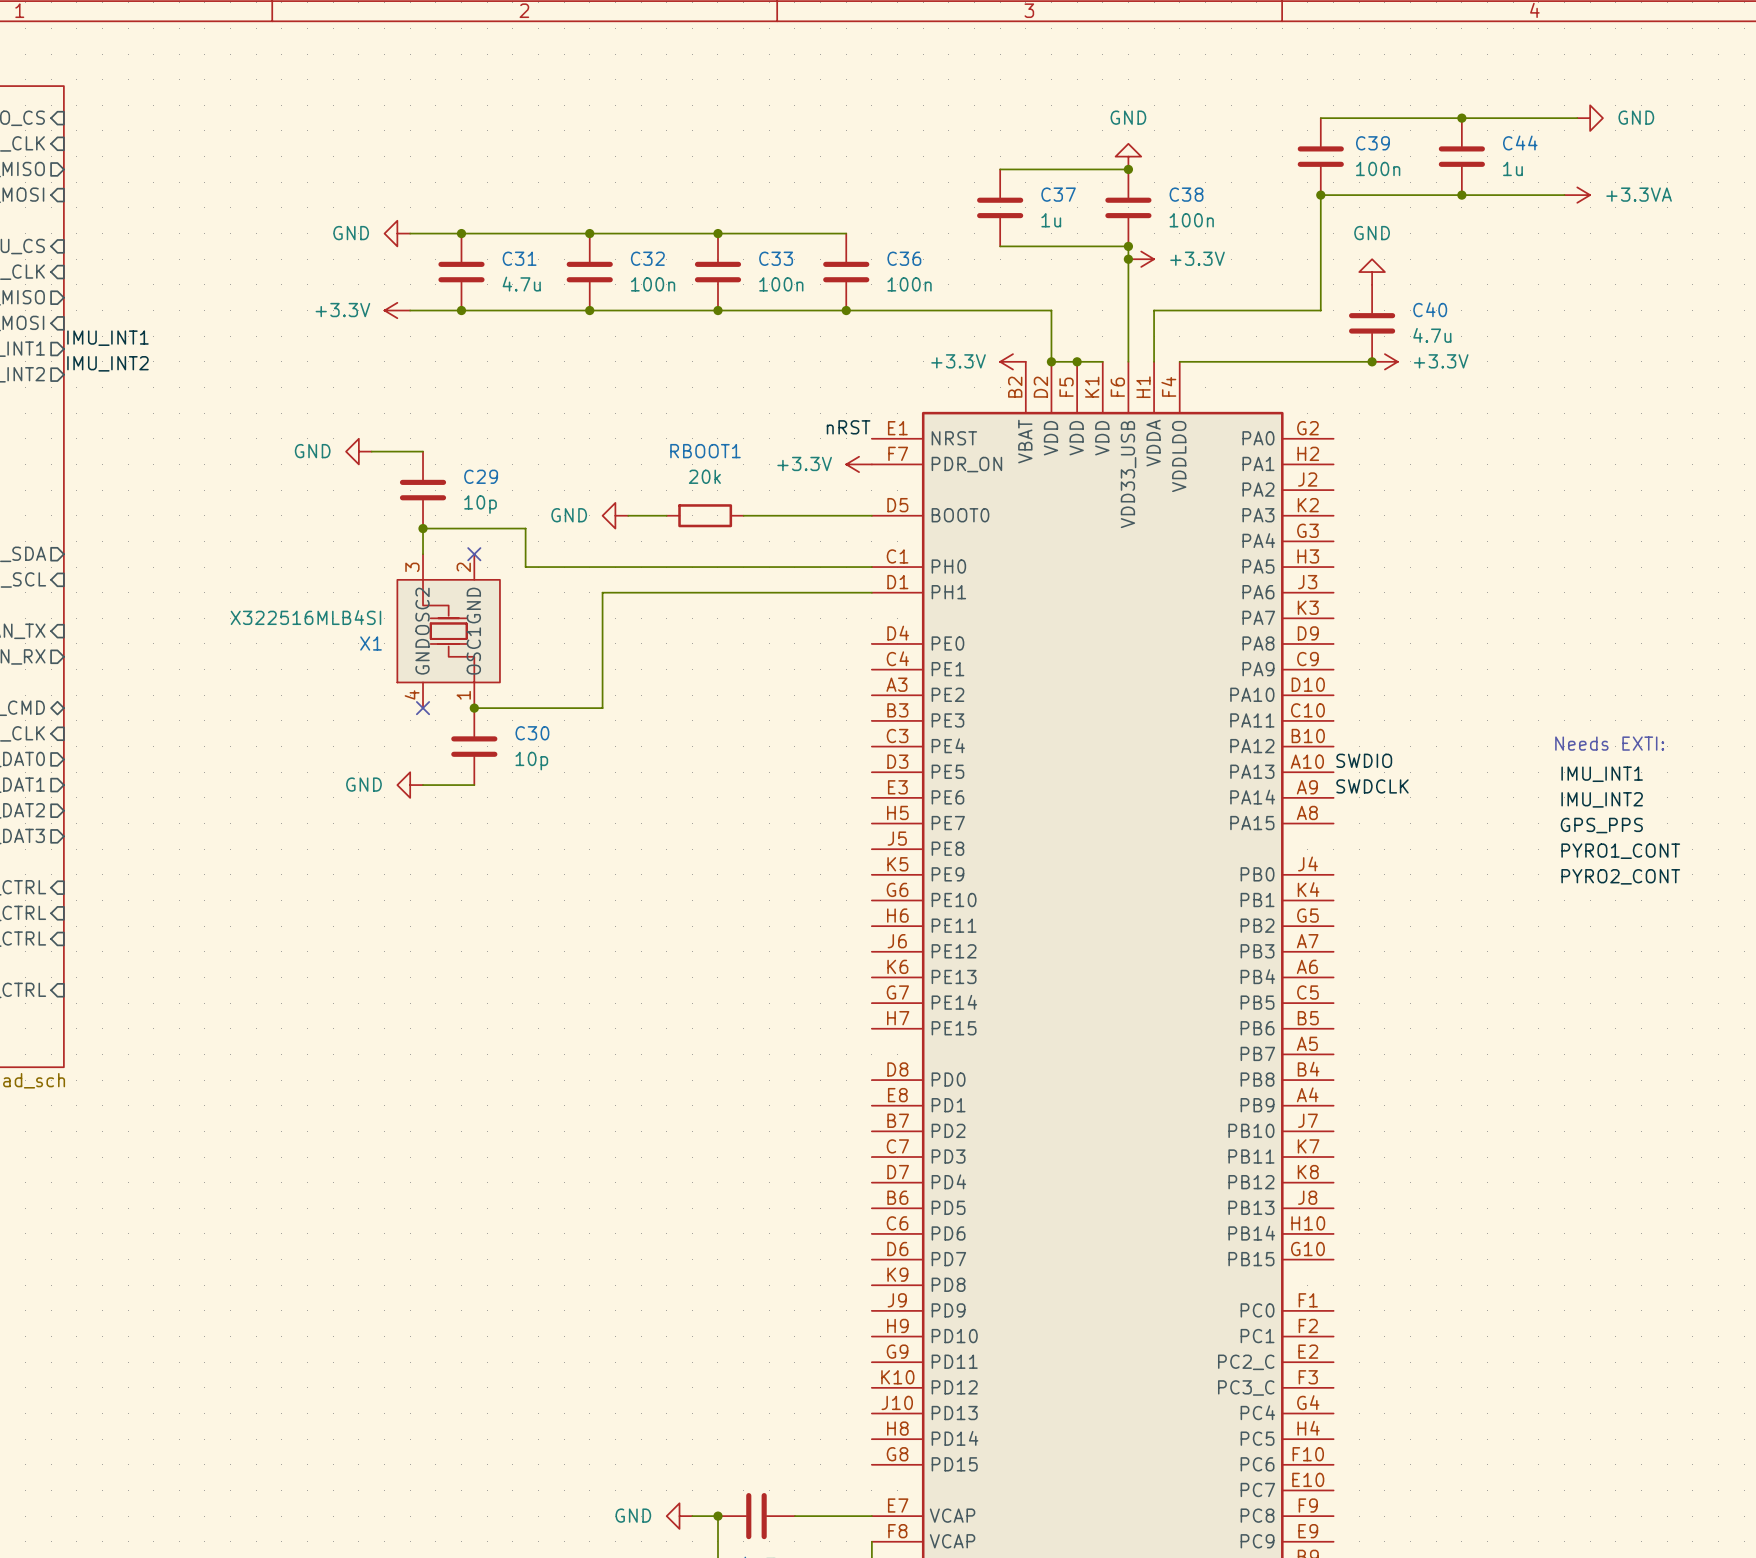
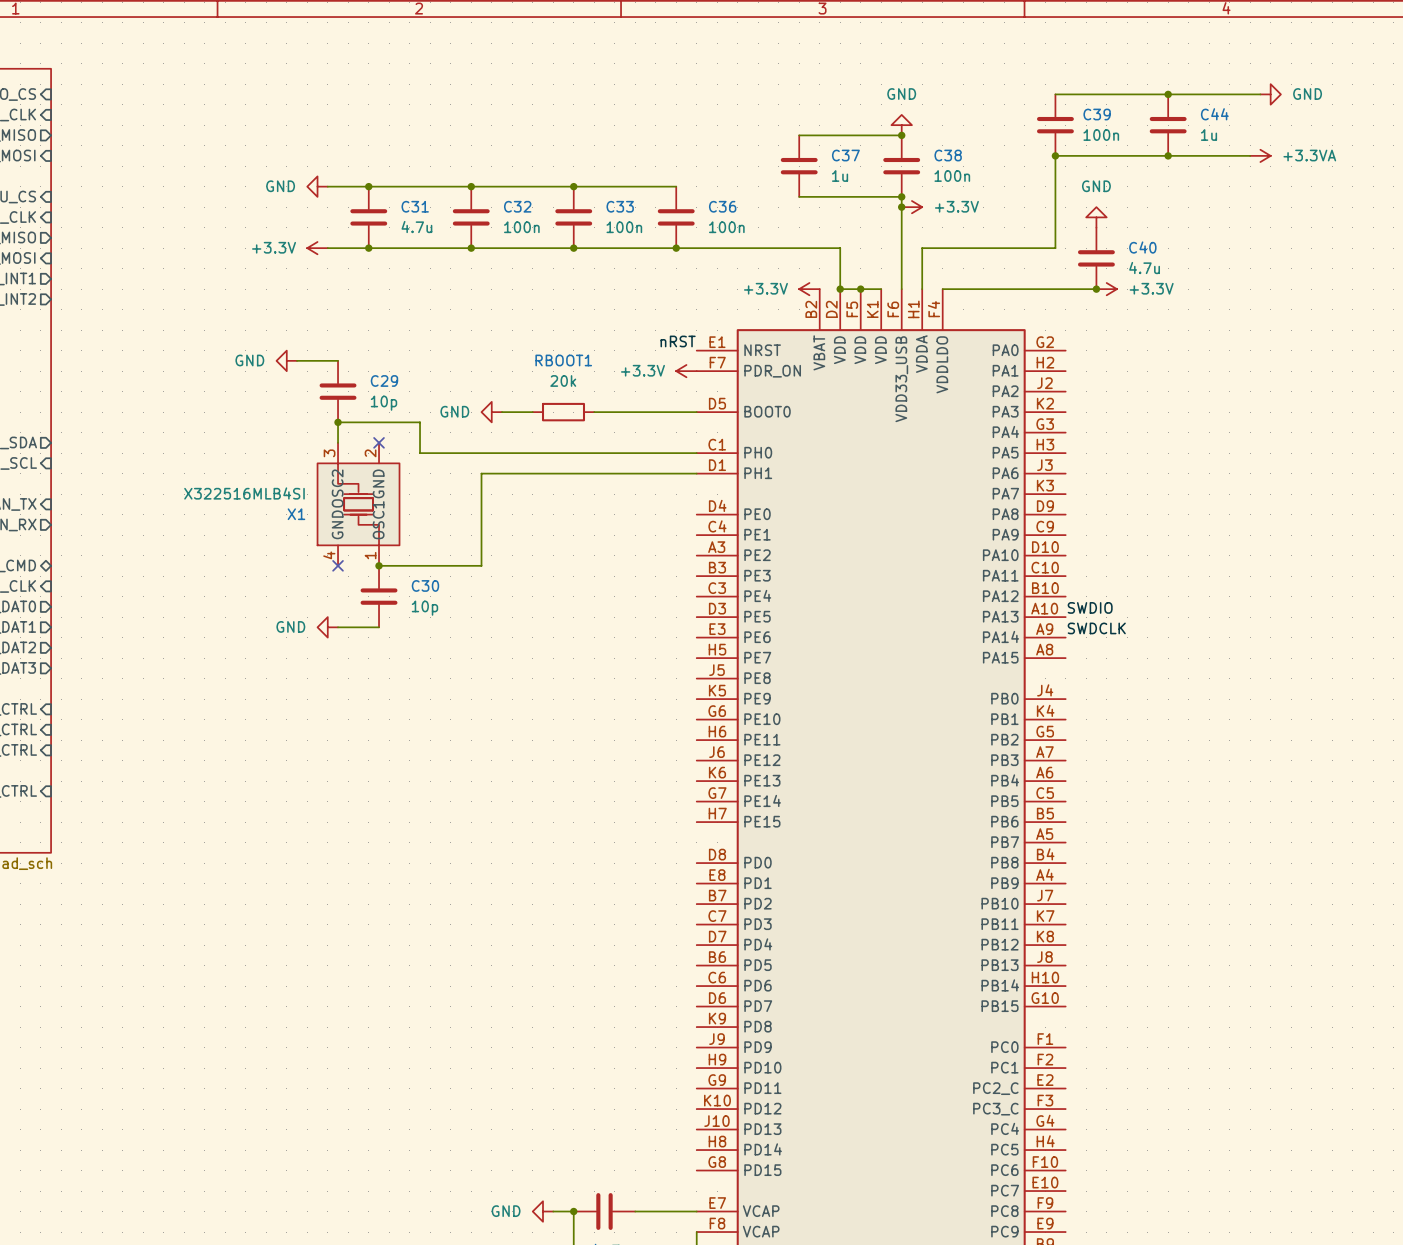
label: IMU_INT1 (107, 338) -> none
label: IMU_INT2 (107, 363) -> none
text: Needs EXTI: (1609, 743) -> none
label: IMU_INT1 (1602, 774) -> none
label: IMU_INT2 (1602, 799) -> none
label: GPS_PPS (1601, 825) -> none
label: PYRO1_CONT (1620, 851) -> none
label: PYRO2_CONT (1620, 876) -> none

